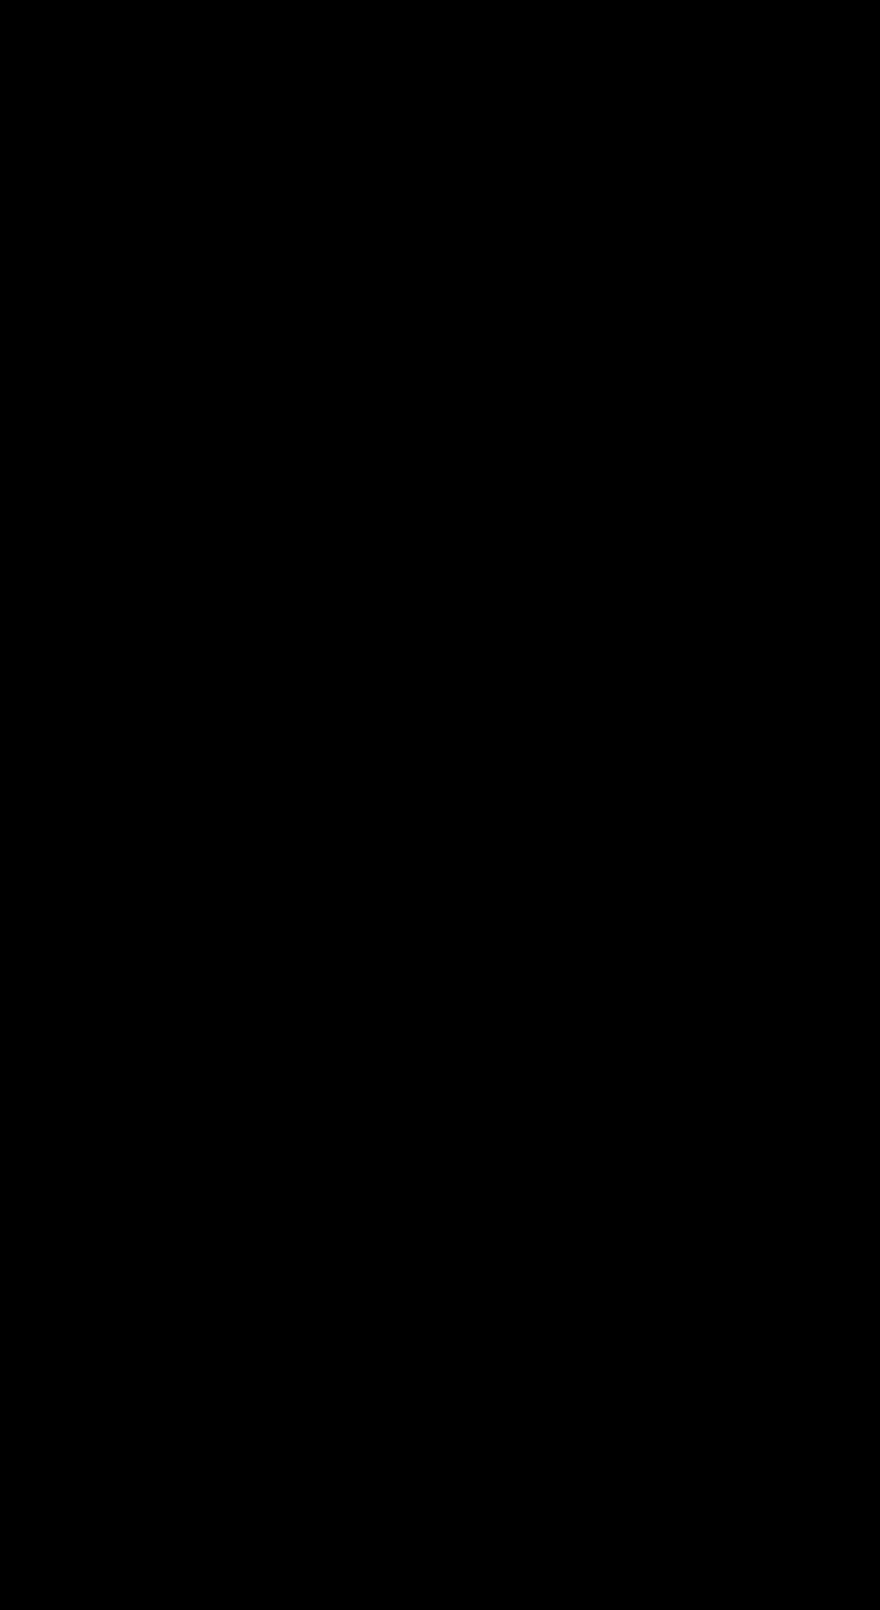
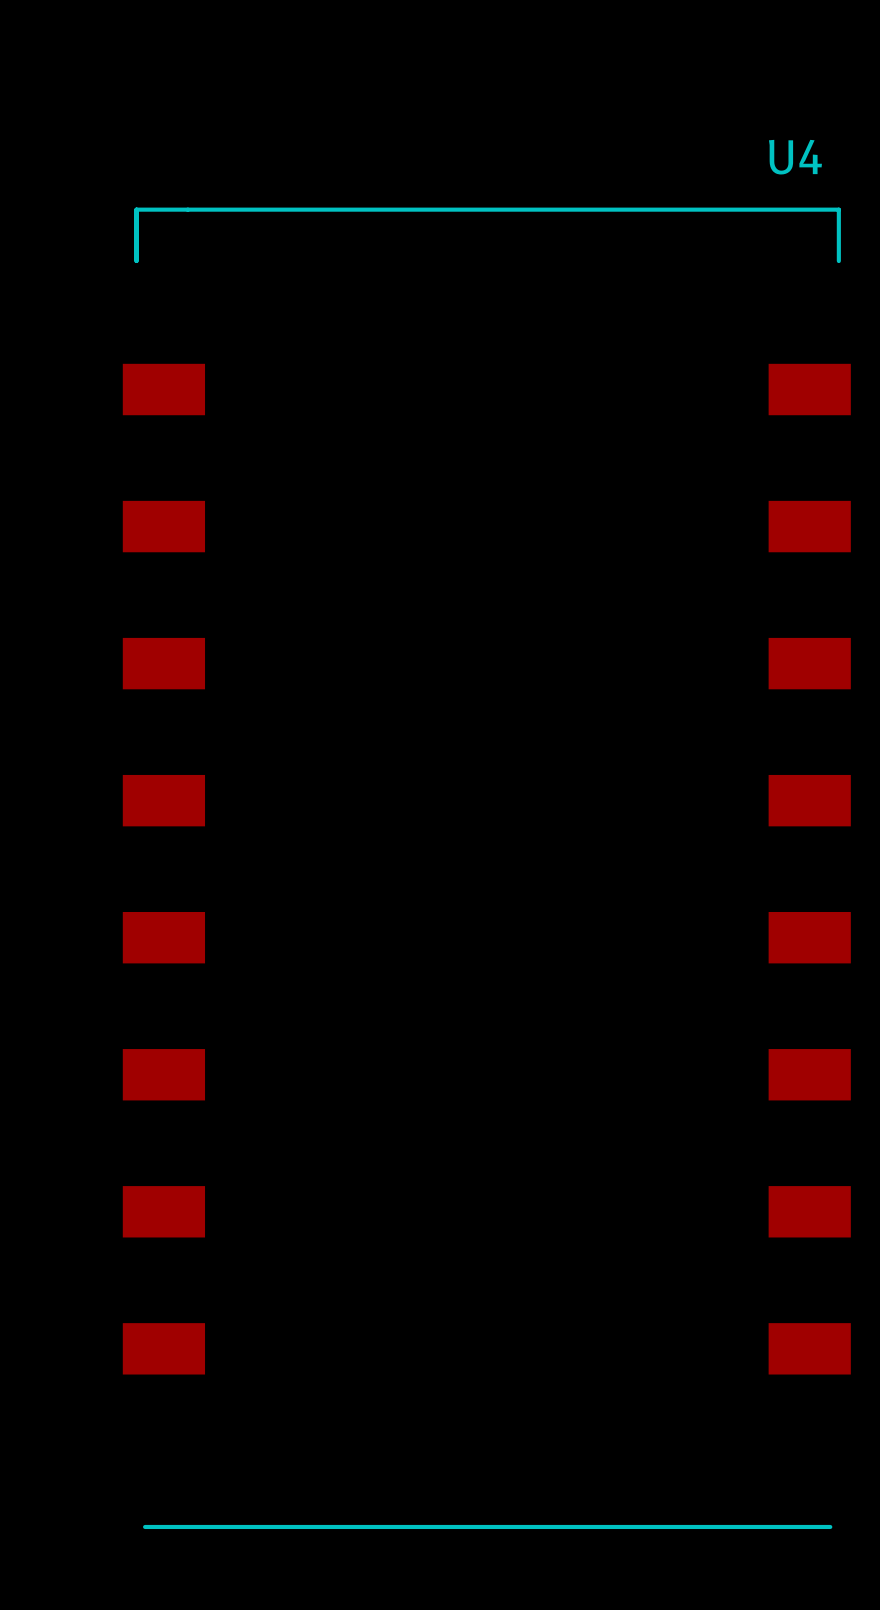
U4: none -> (486, 868)

